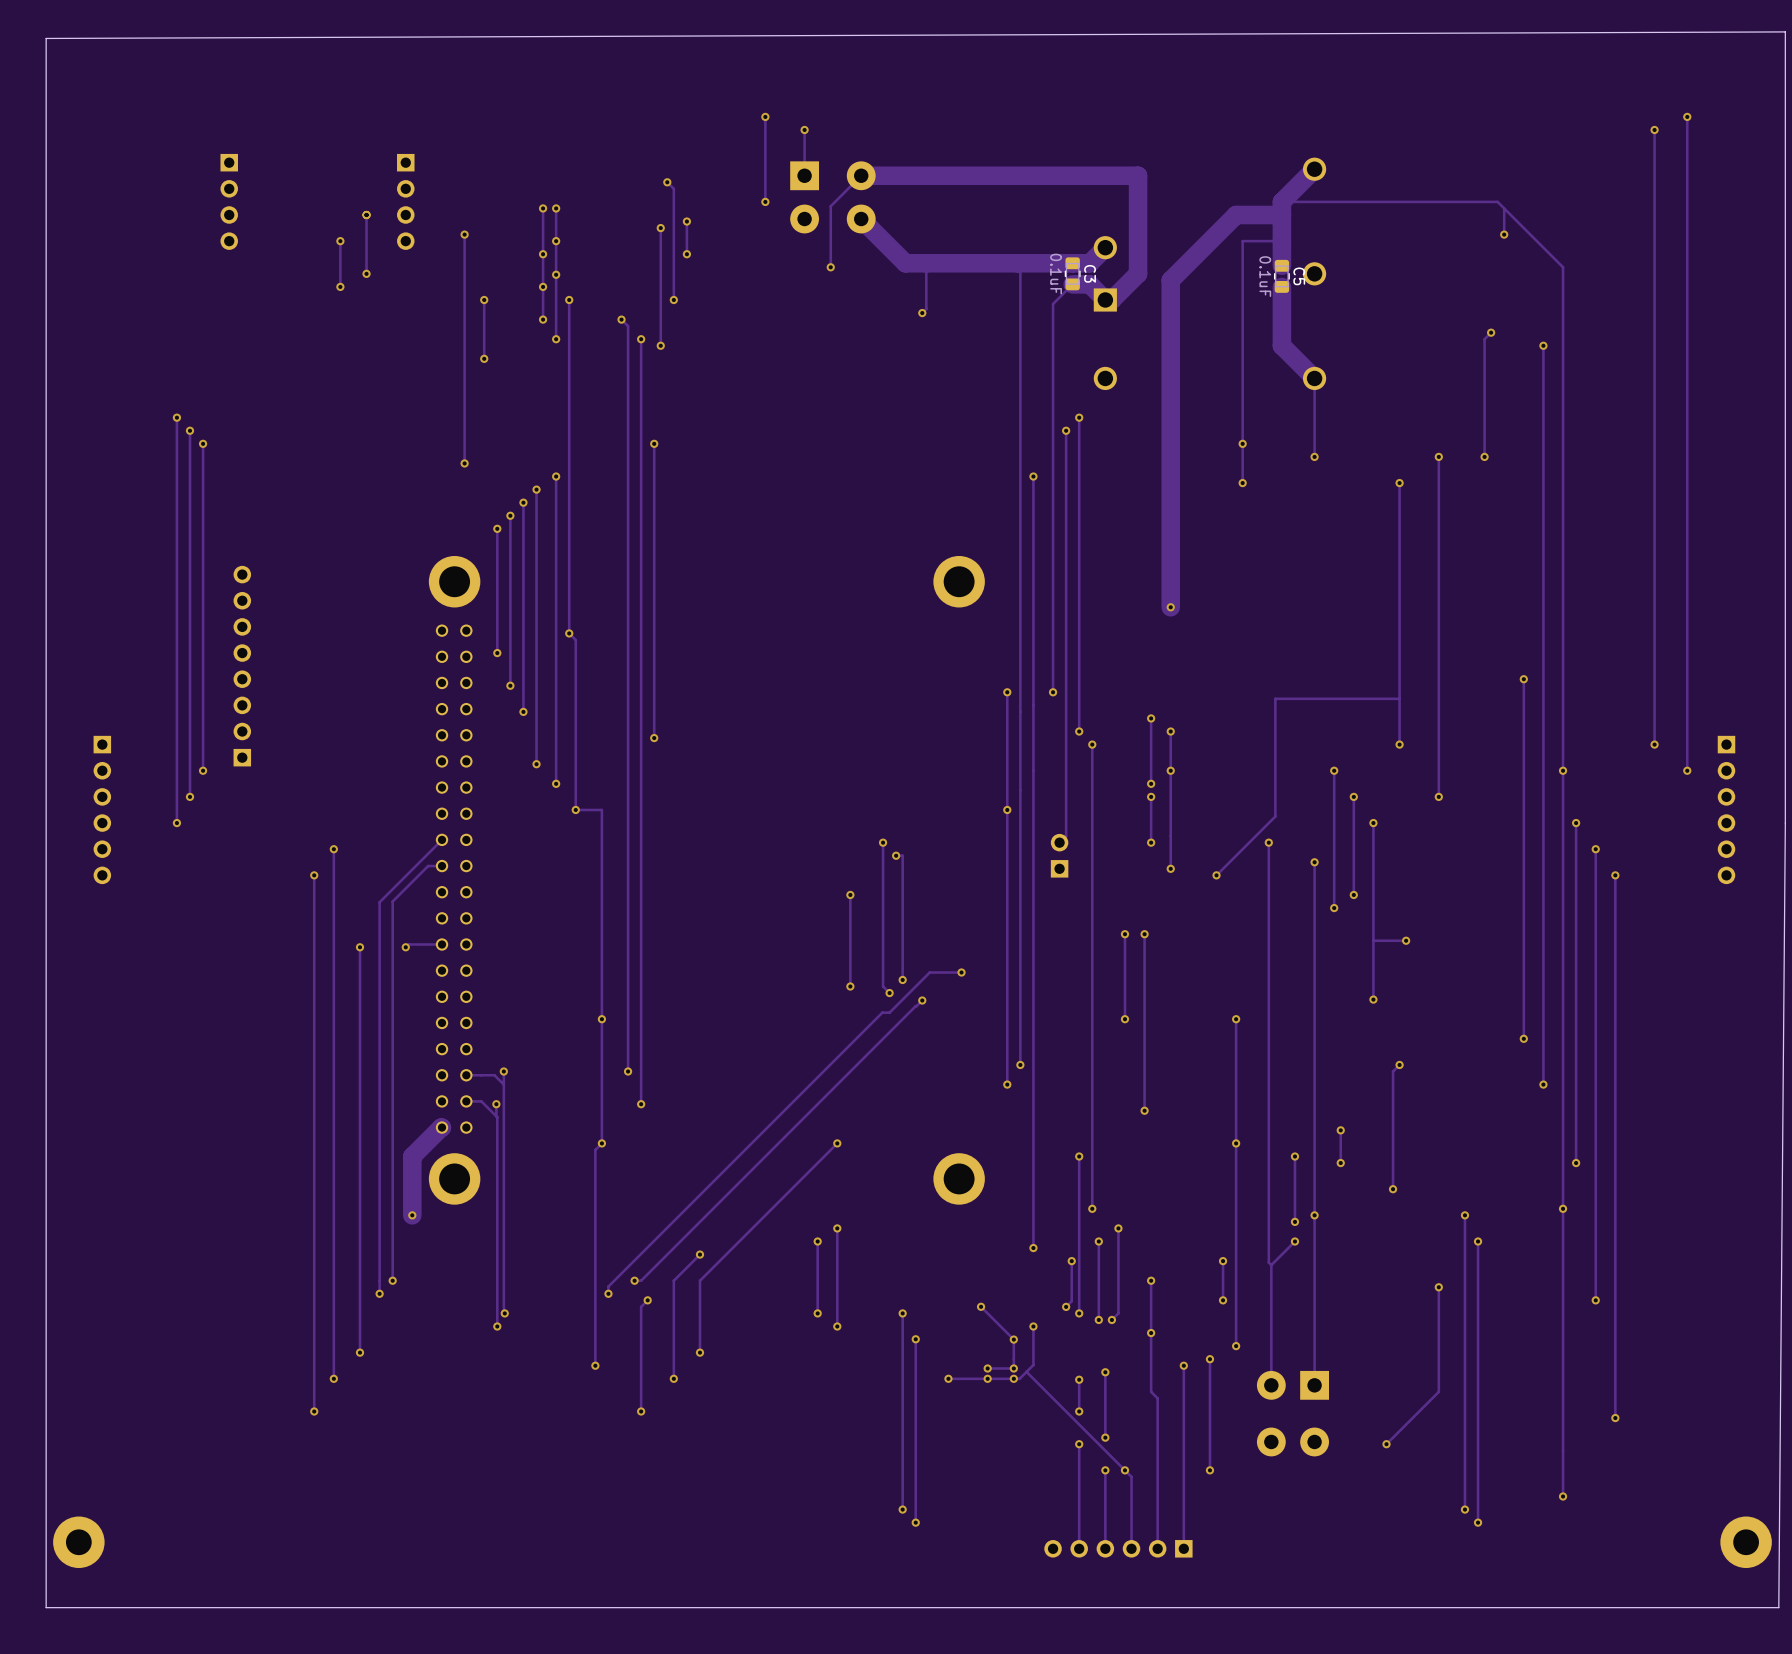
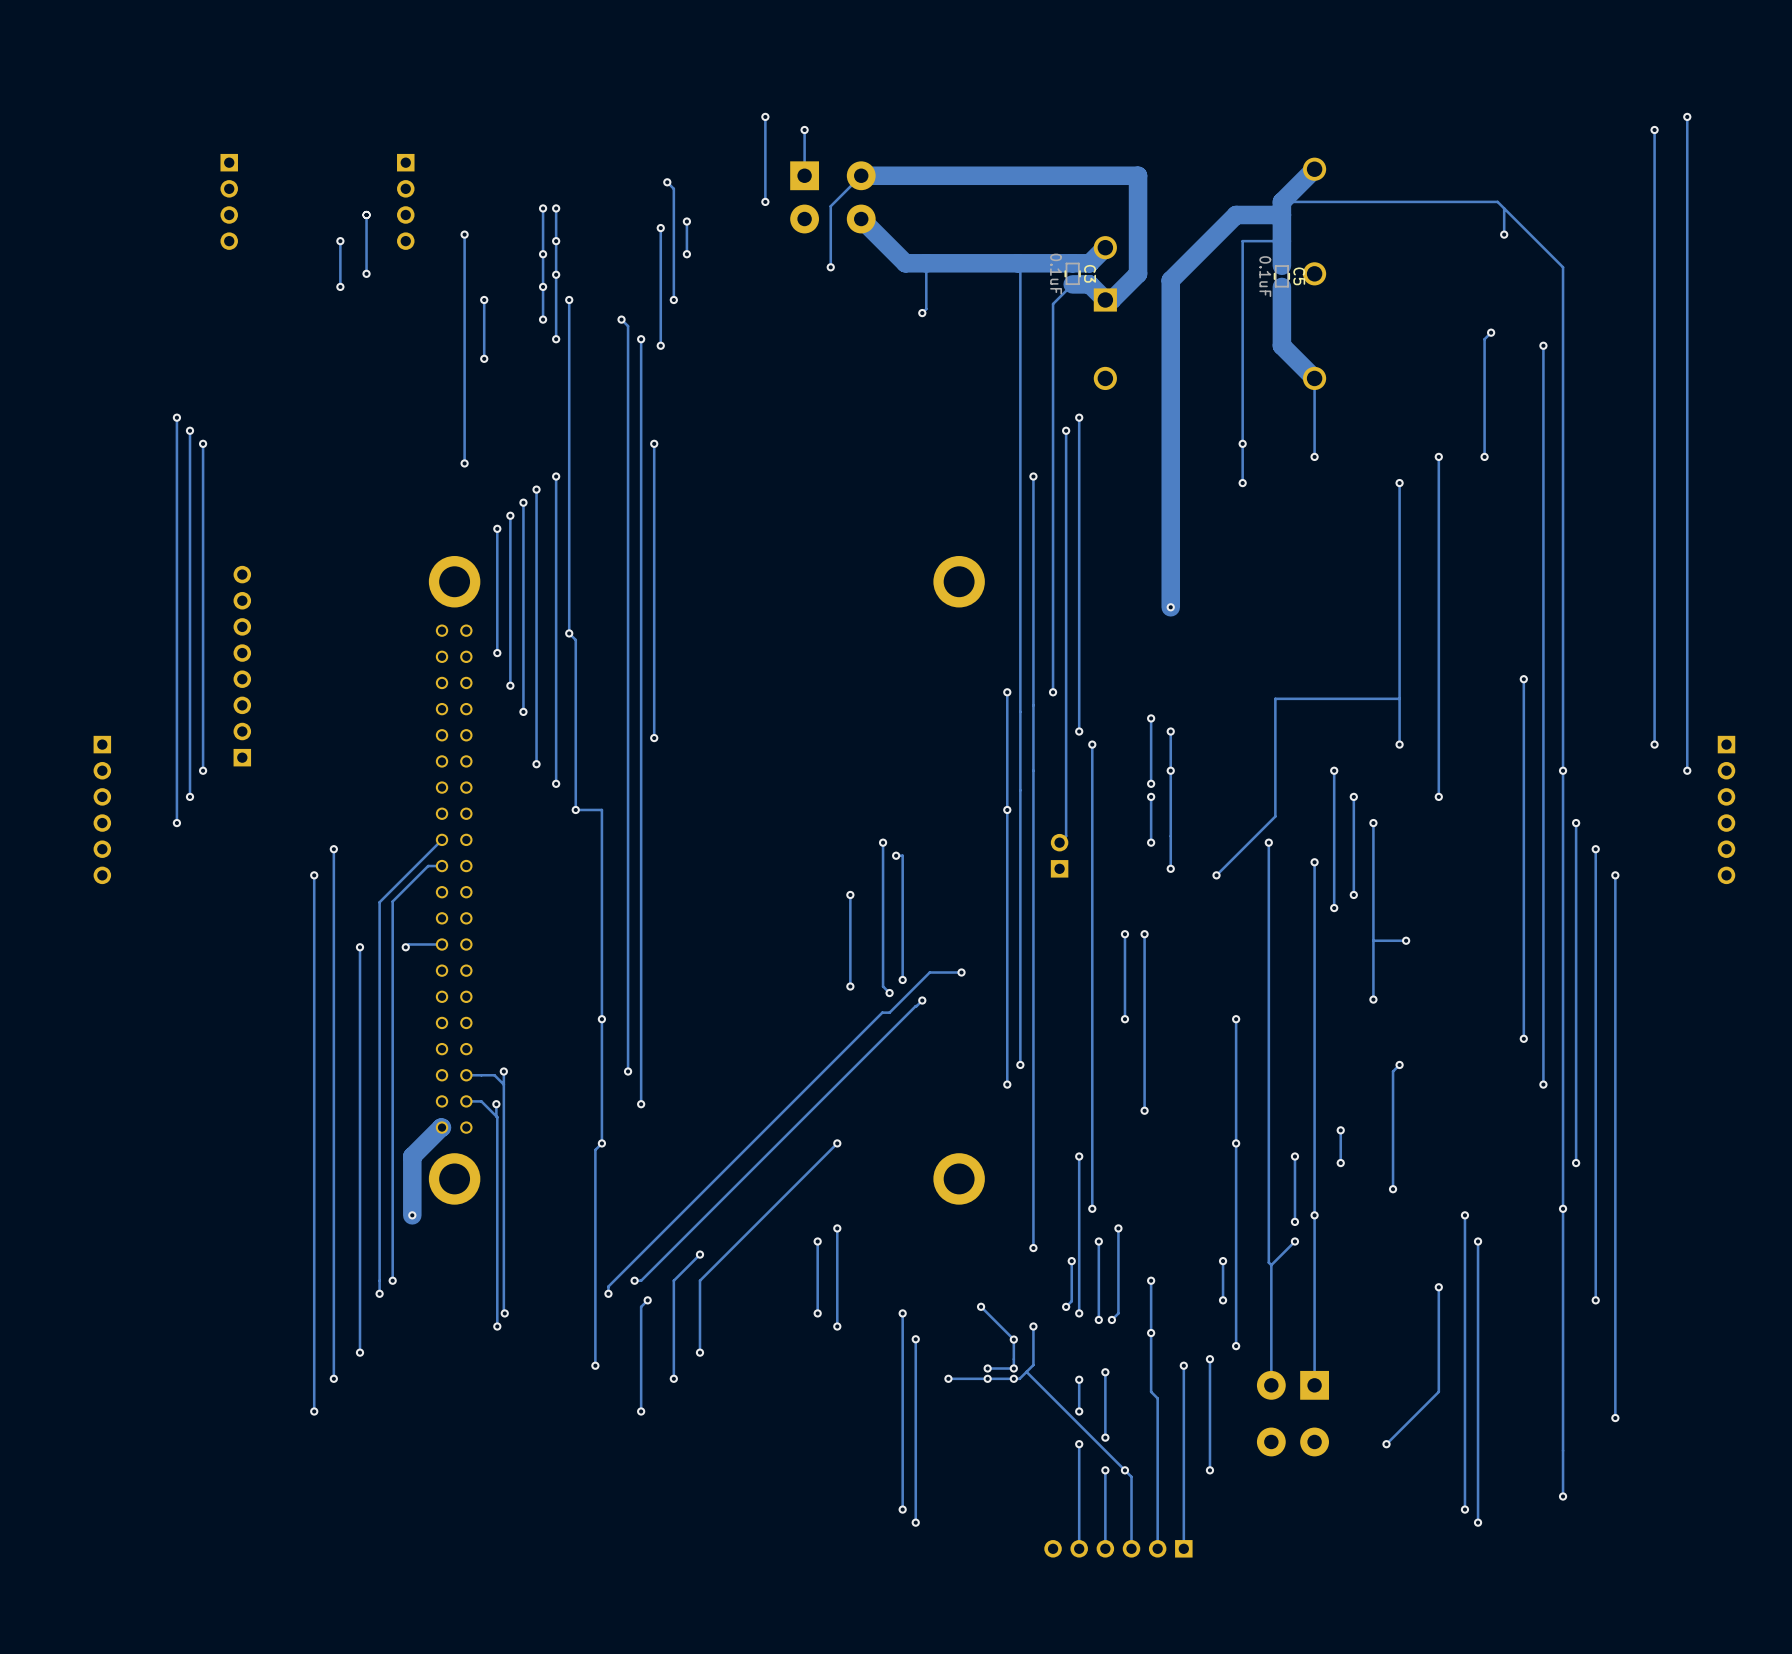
board edge: (1785, 31) (46, 38) (46, 1607) (1778, 1607) (1785, 823) (1785, 31) -> none
part: (78, 1542) -> none
part: (1746, 1542) -> none

